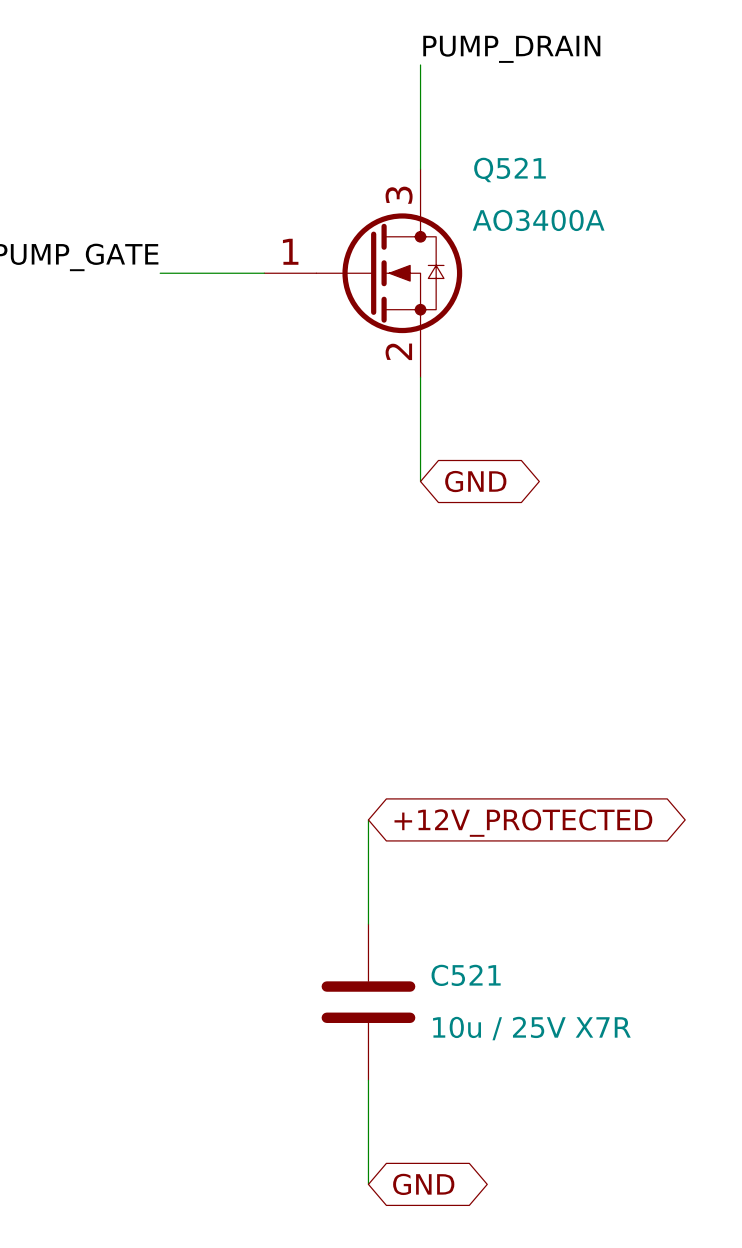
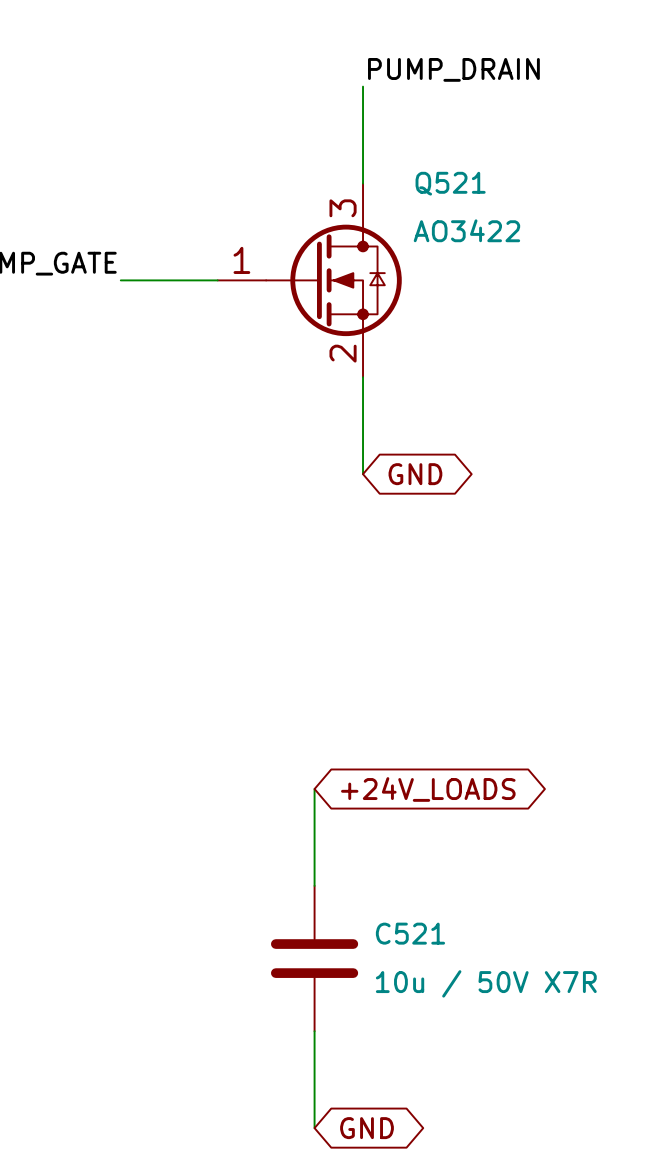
Q521 value: AO3400A (538, 220) -> AO3422 (466, 230)
global label: +12V_PROTECTED (523, 823) -> +24V_LOADS (428, 789)
C521 value: 10u / 25V X7R (531, 1028) -> 10u / 50V X7R (486, 983)

